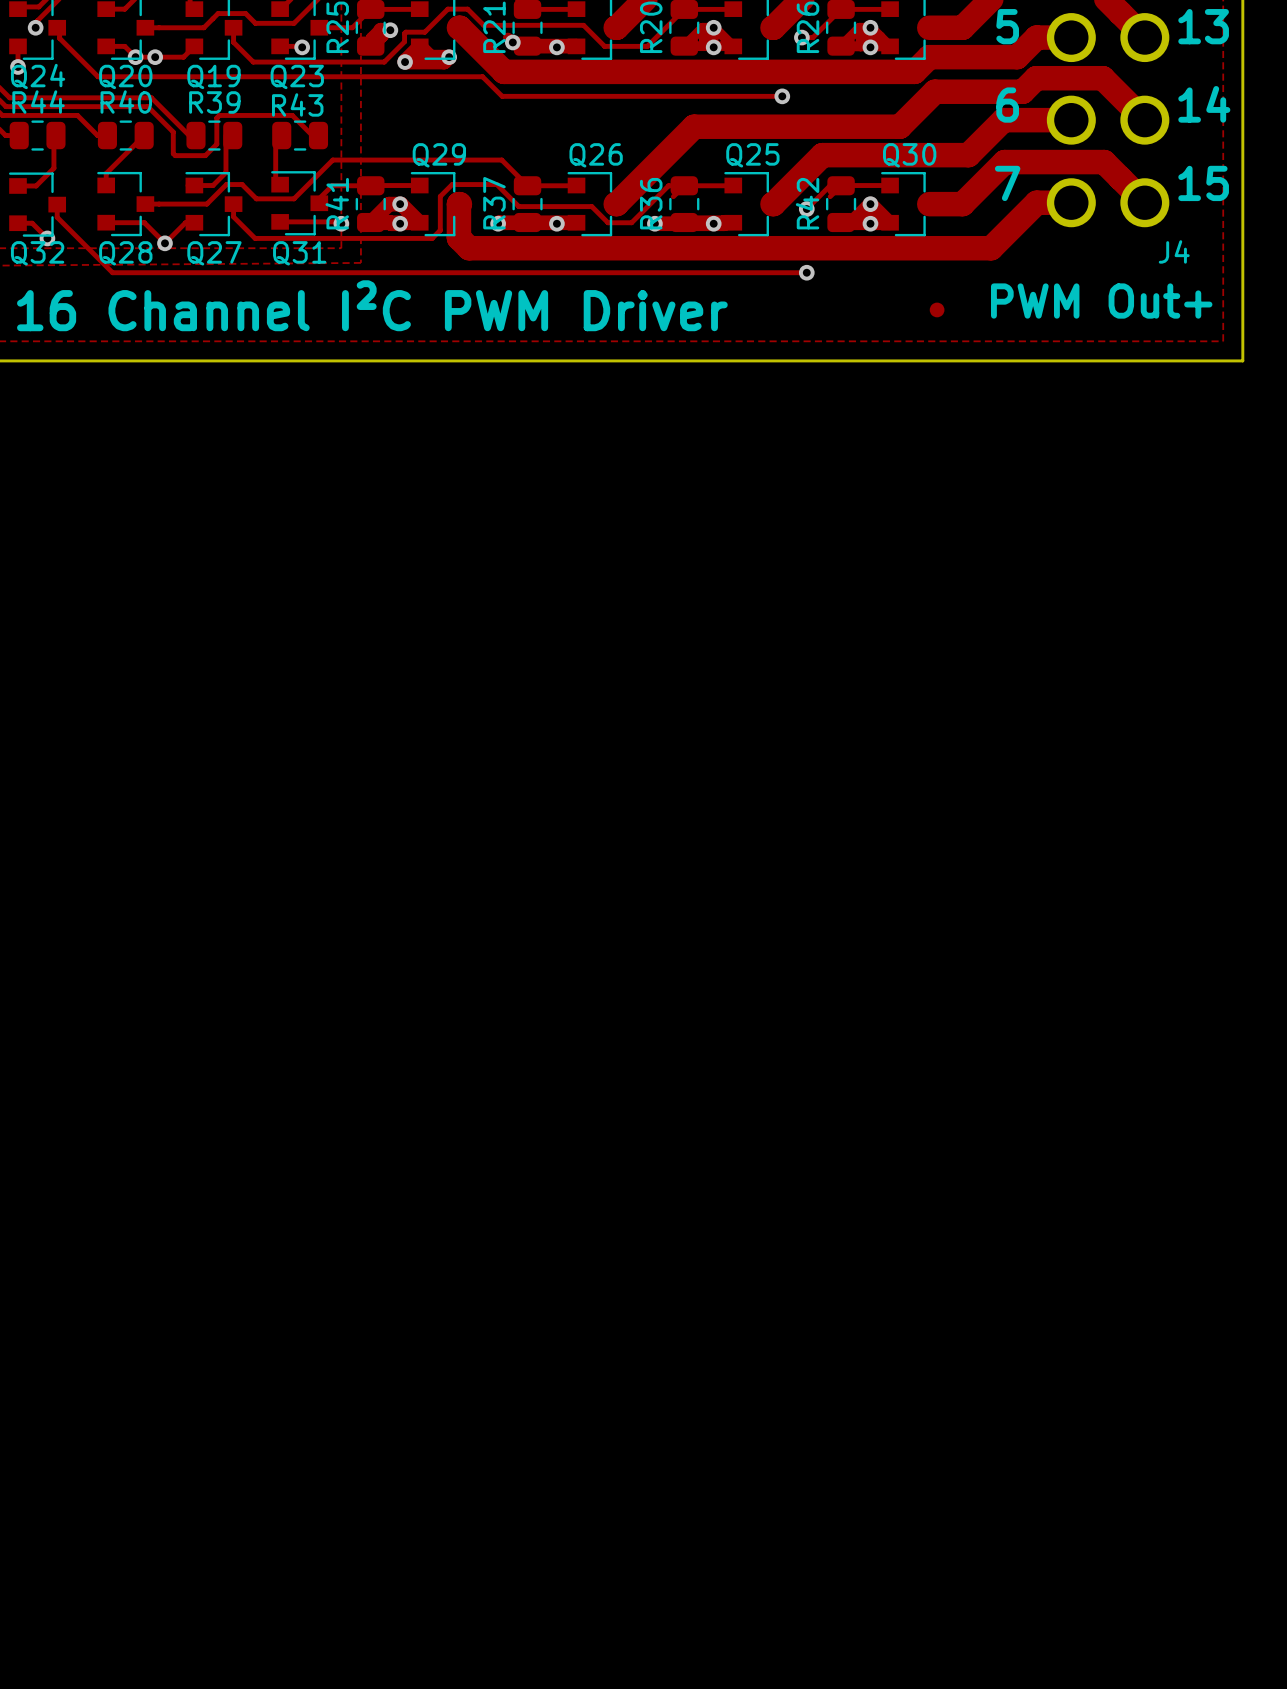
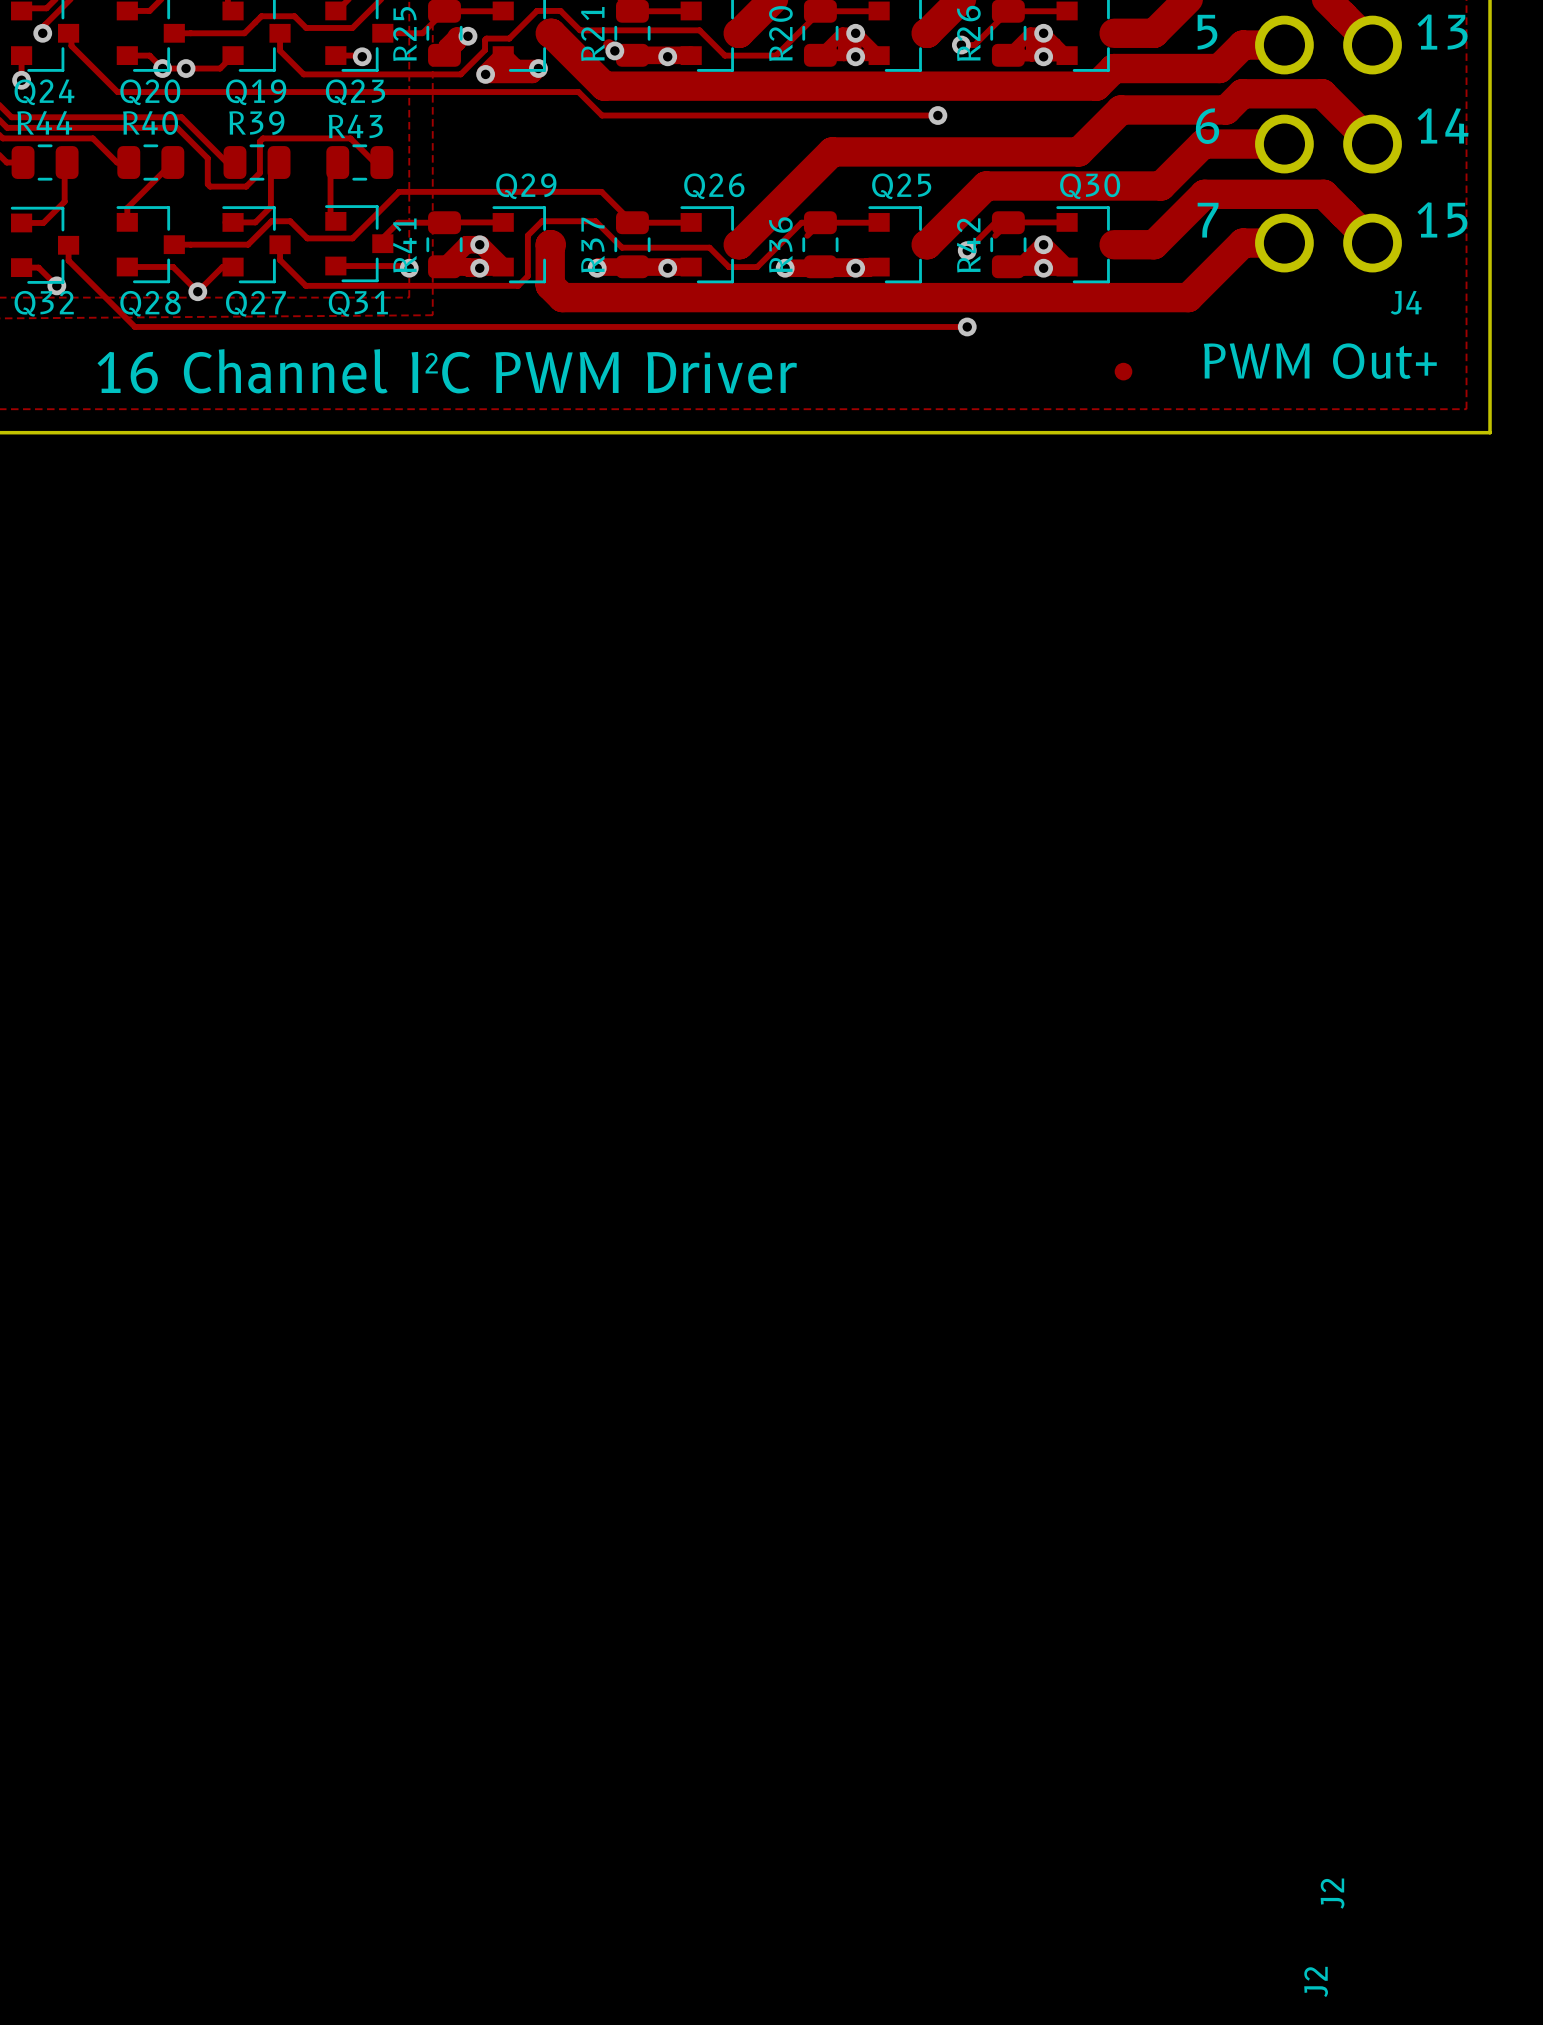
drawing: none -> [1320, 1878, 1345, 1909]
drawing: none -> [1304, 1966, 1328, 1998]

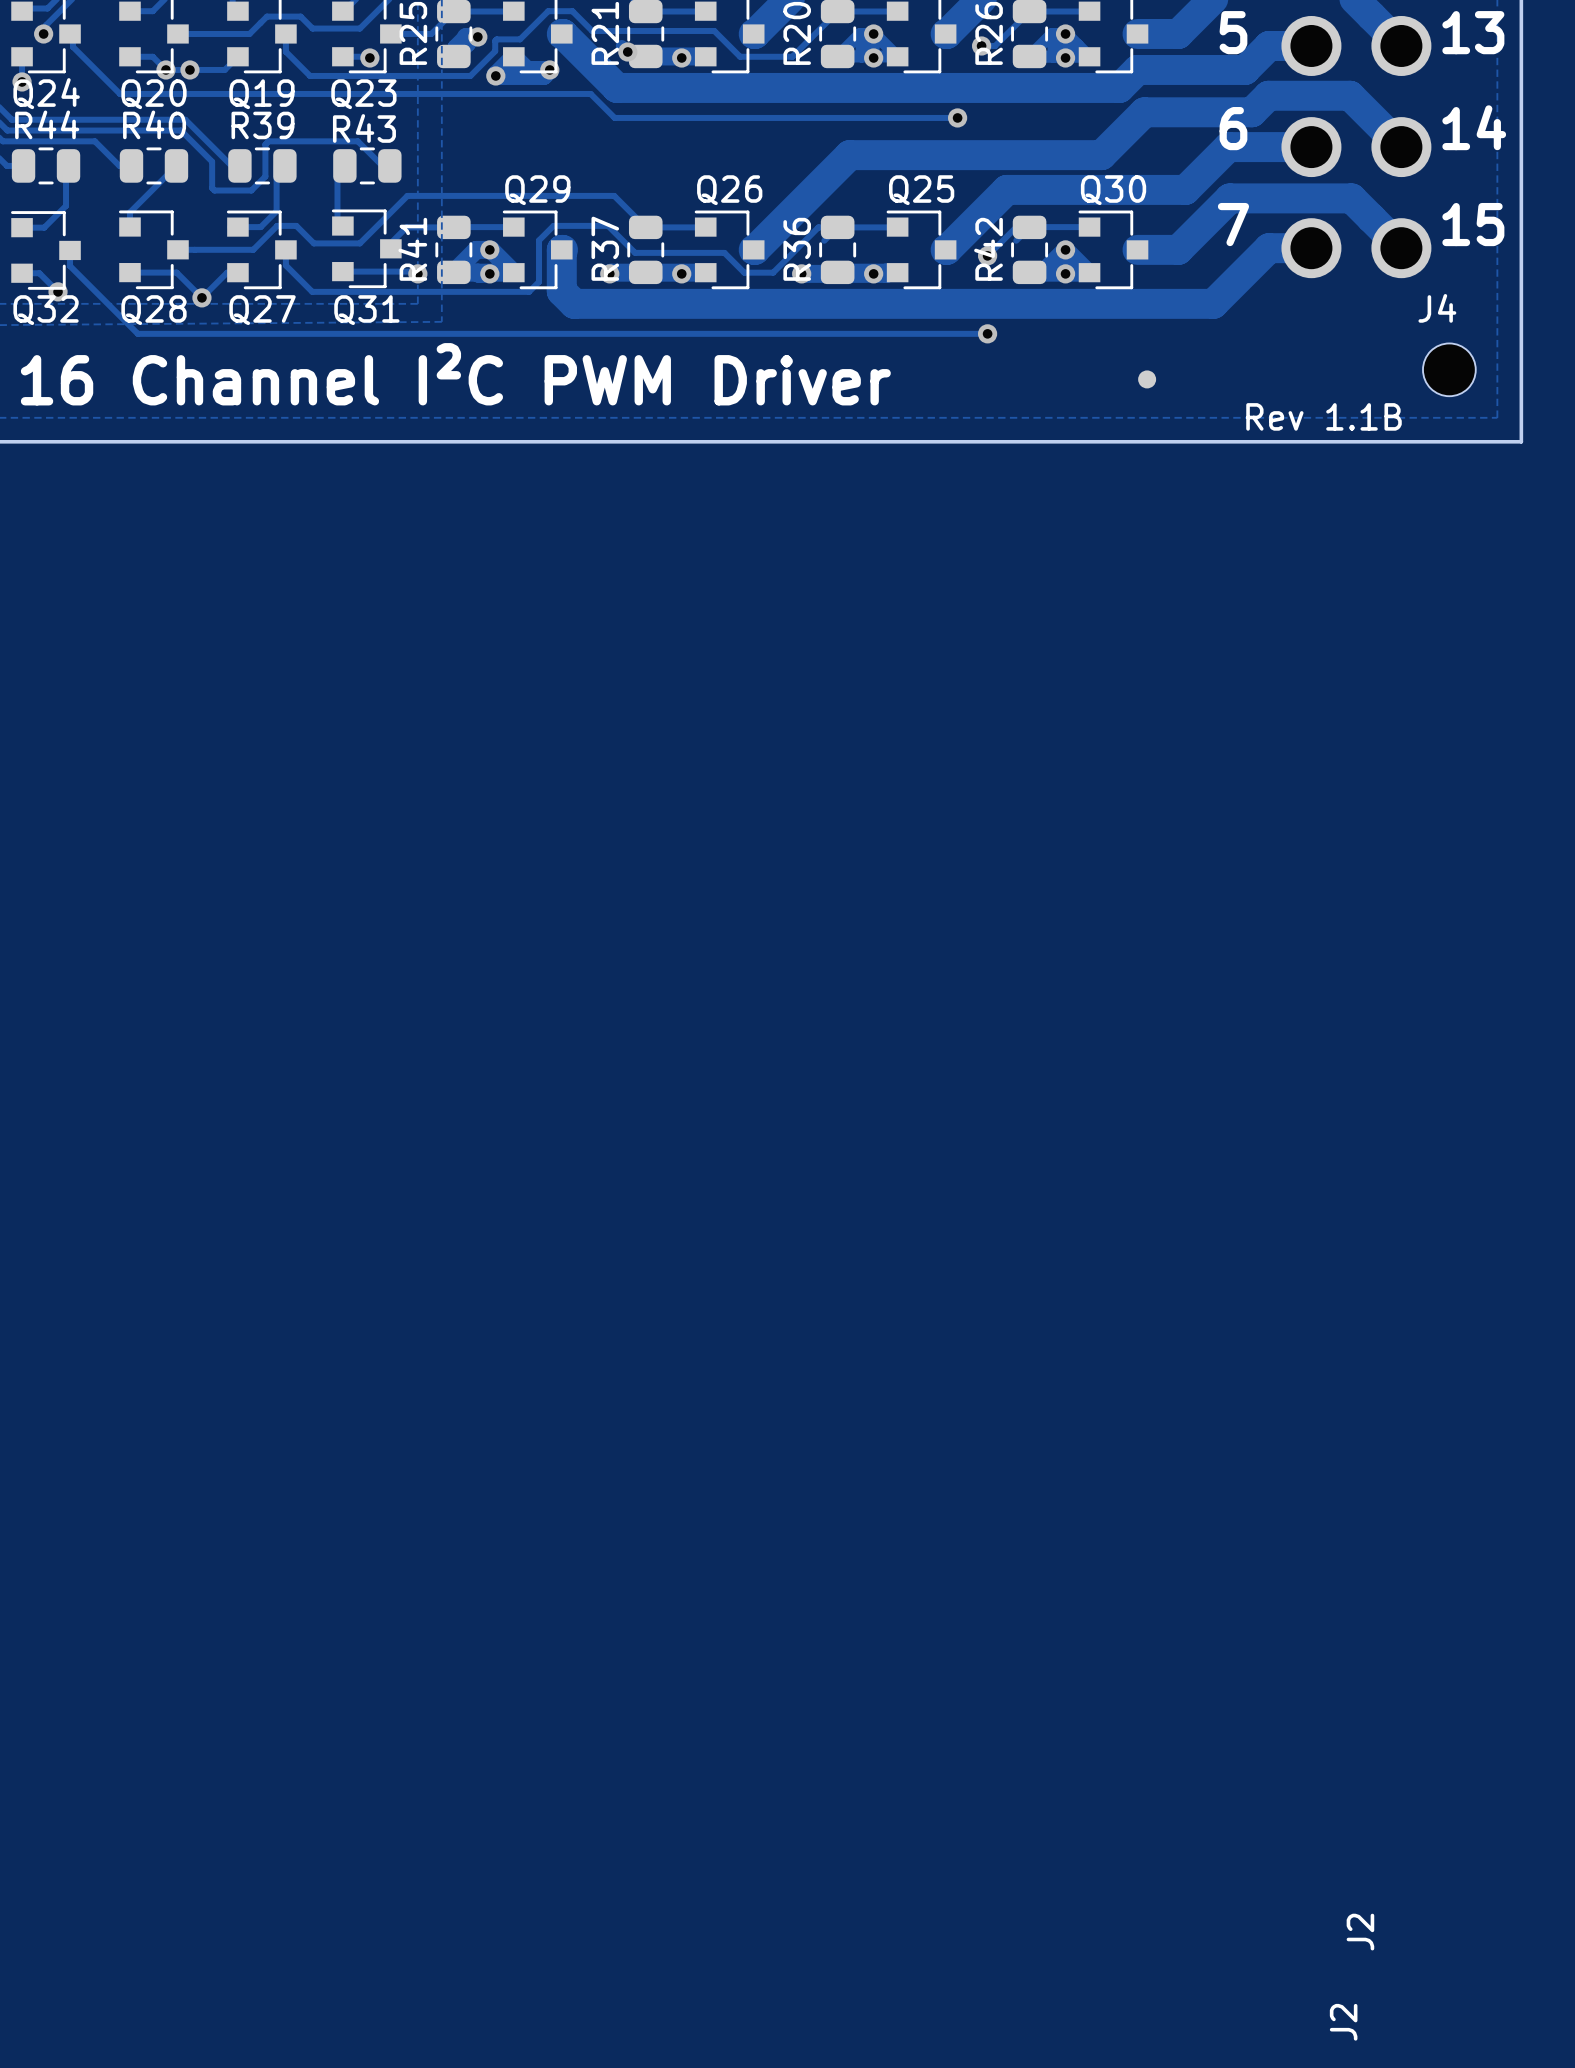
text: PWM Out+ (1320, 361) -> none
part: none -> (1449, 369)
text: none -> Rev 1.1B (1324, 416)

